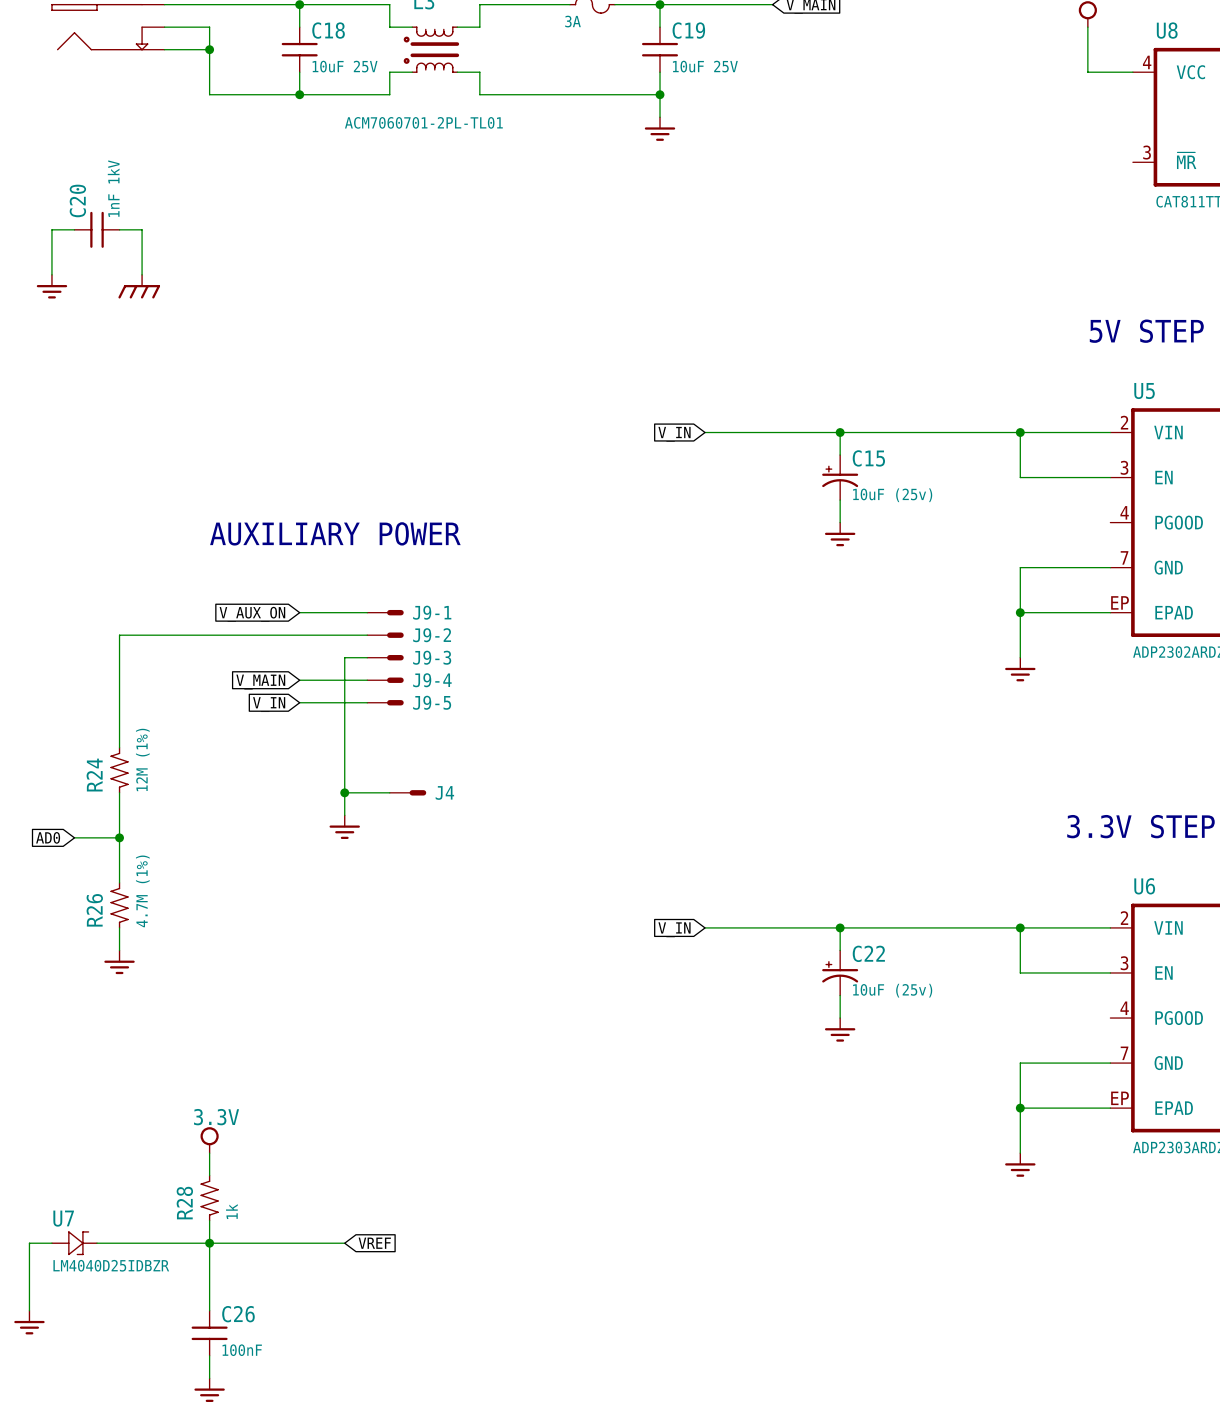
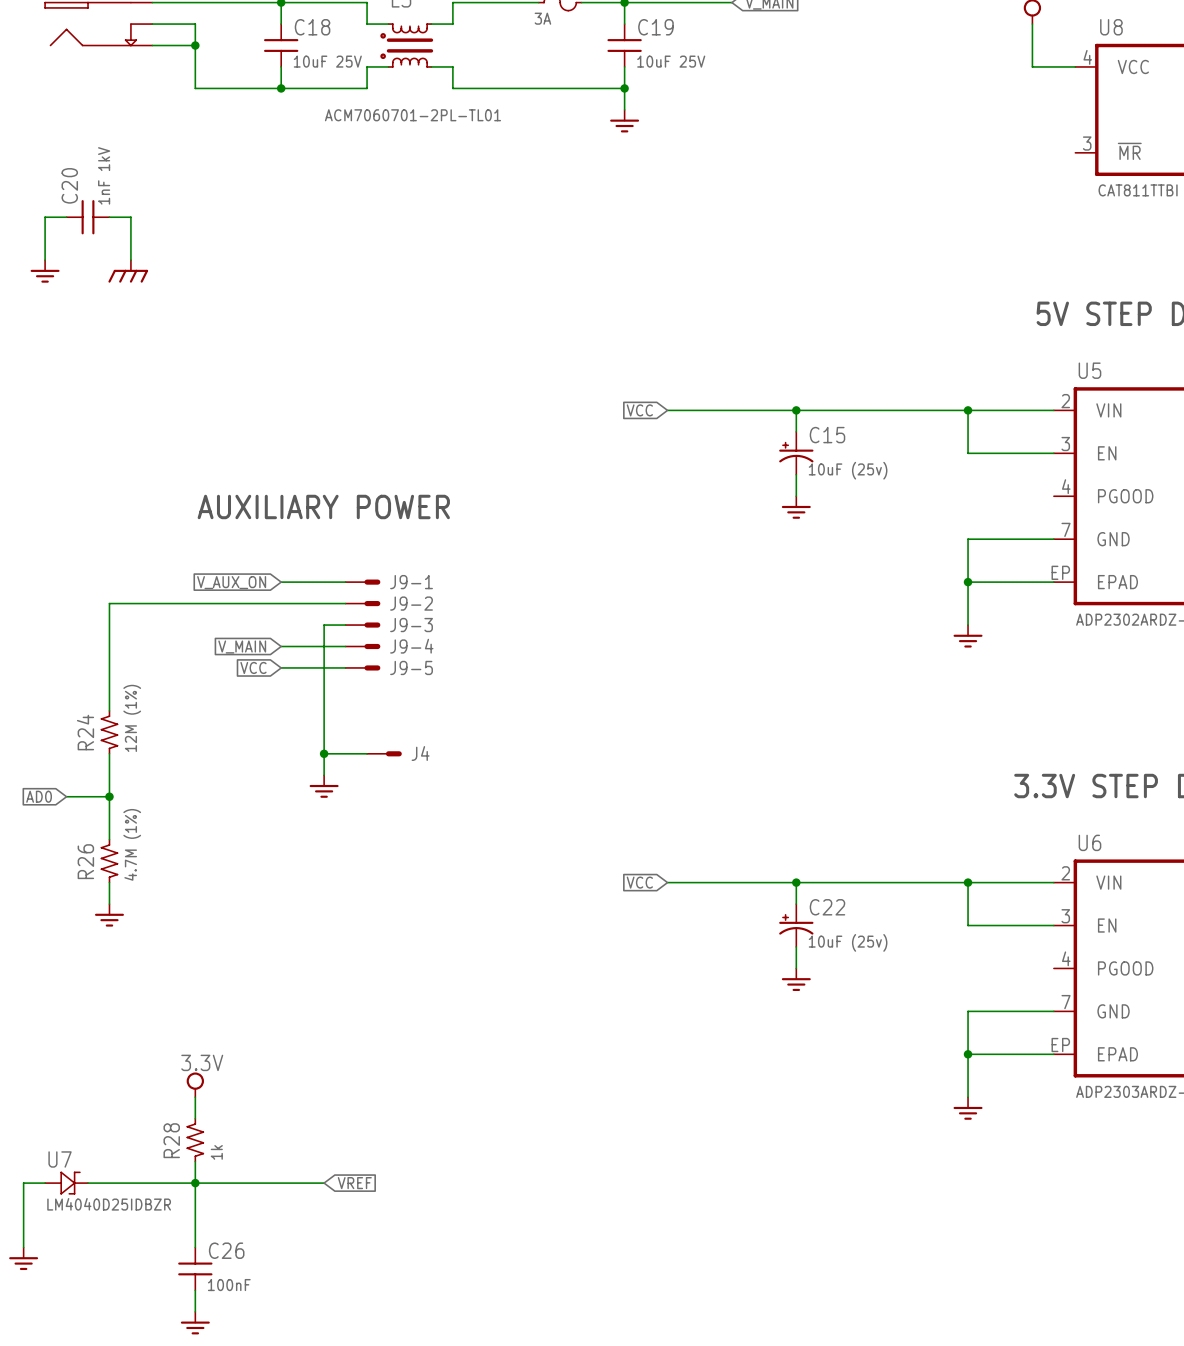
global label: V_IN (674, 434) -> VCC (639, 410)
global label: V_IN (269, 704) -> VCC (253, 667)
global label: V_IN (674, 929) -> VCC (639, 882)

